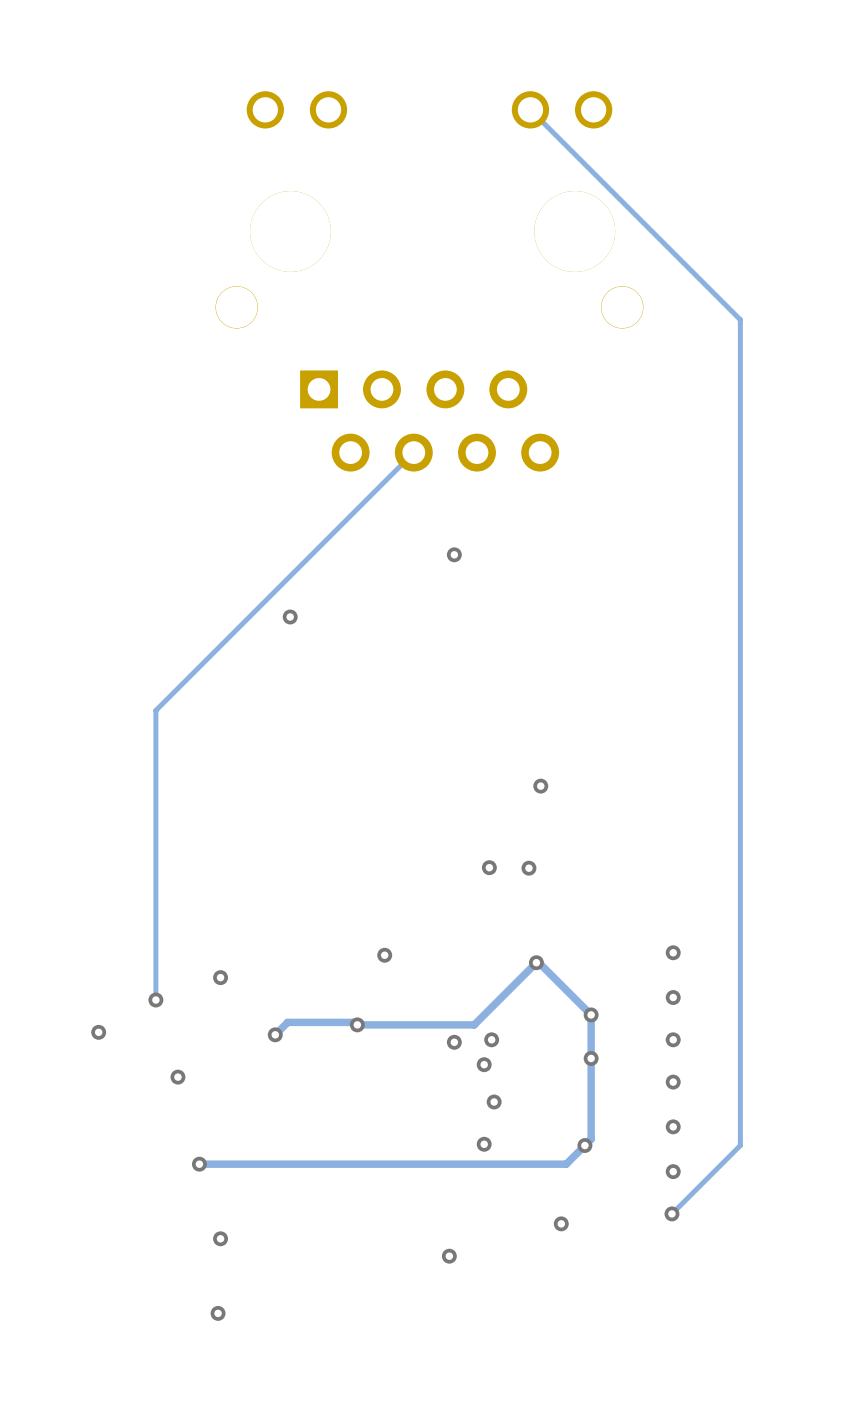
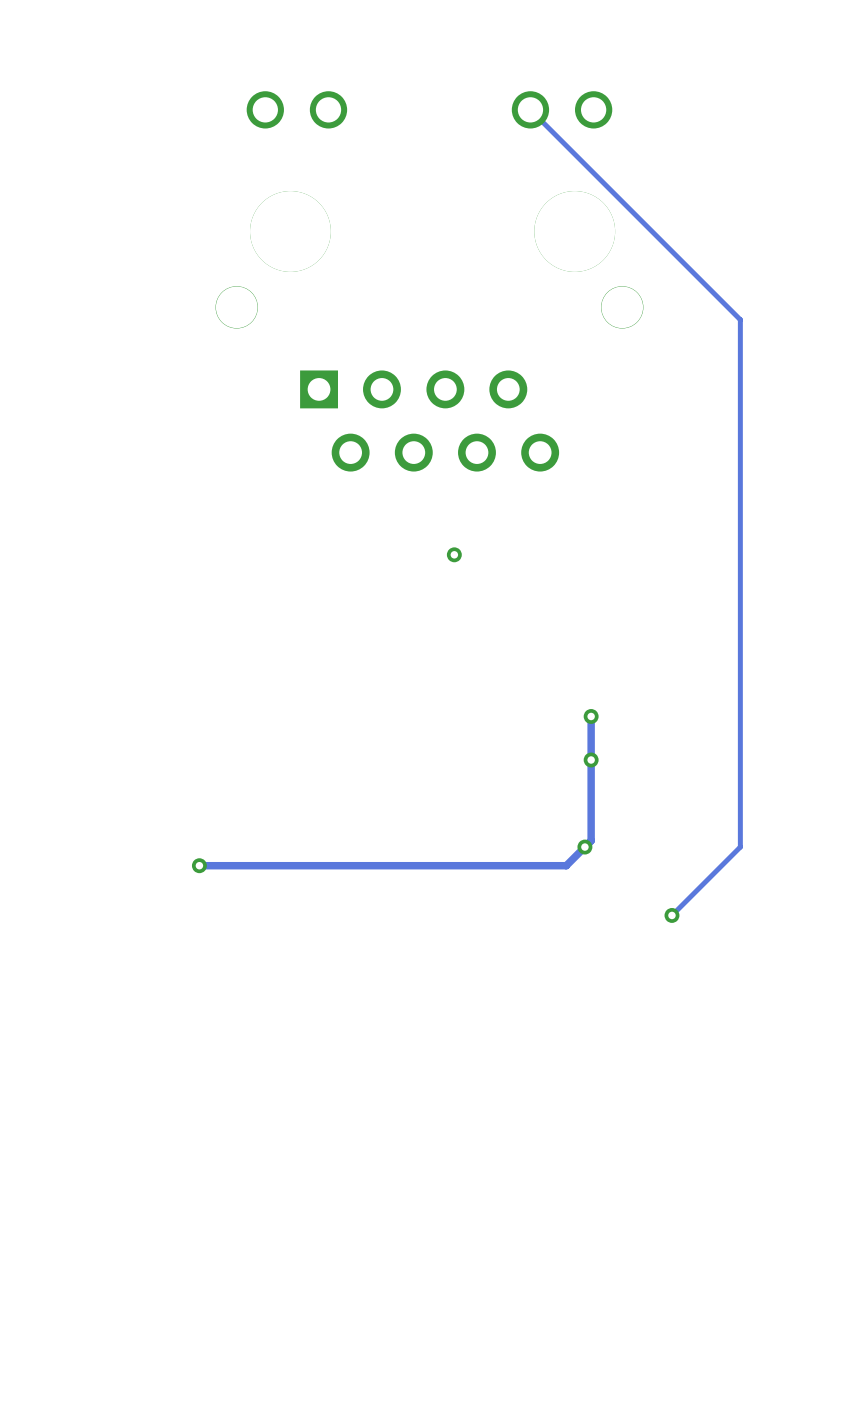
track: (413, 452) (155, 710) (155, 1000) -> none
via: (290, 616) -> none
track: none -> (591, 716) (591, 840) (566, 865) (199, 865)
via: none -> (591, 716)
via: none -> (591, 760)
via: (540, 786) -> none
via: none -> (584, 847)
track: (740, 847) (740, 1145) (671, 1213) -> (740, 847) (671, 915)
via: none -> (199, 865)
via: (489, 867) -> none
via: (528, 868) -> none
via position: (673, 952) -> (671, 915)
via: (384, 955) -> none
via: (536, 962) -> none
via: (220, 977) -> none
via: (673, 997) -> none
via: (155, 1000) -> none
via: (591, 1014) -> none
via: (357, 1024) -> none
via: (98, 1032) -> none
track: (275, 1034) (287, 1022) (354, 1022) (357, 1024) (474, 1024) (536, 962) (538, 962) (591, 1014) (591, 1139) (566, 1164) (199, 1164) -> none
via: (275, 1034) -> none
via: (491, 1039) -> none
via: (673, 1039) -> none
via: (454, 1042) -> none
via: (591, 1058) -> none
via: (484, 1064) -> none
via: (177, 1077) -> none
via: (673, 1082) -> none
via: (494, 1101) -> none
via: (673, 1126) -> none
via: (484, 1144) -> none
via: (584, 1145) -> none
via: (199, 1164) -> none
via: (673, 1171) -> none
via: (671, 1213) -> none
via: (561, 1223) -> none
via: (220, 1238) -> none
via: (449, 1256) -> none
via: (218, 1313) -> none

